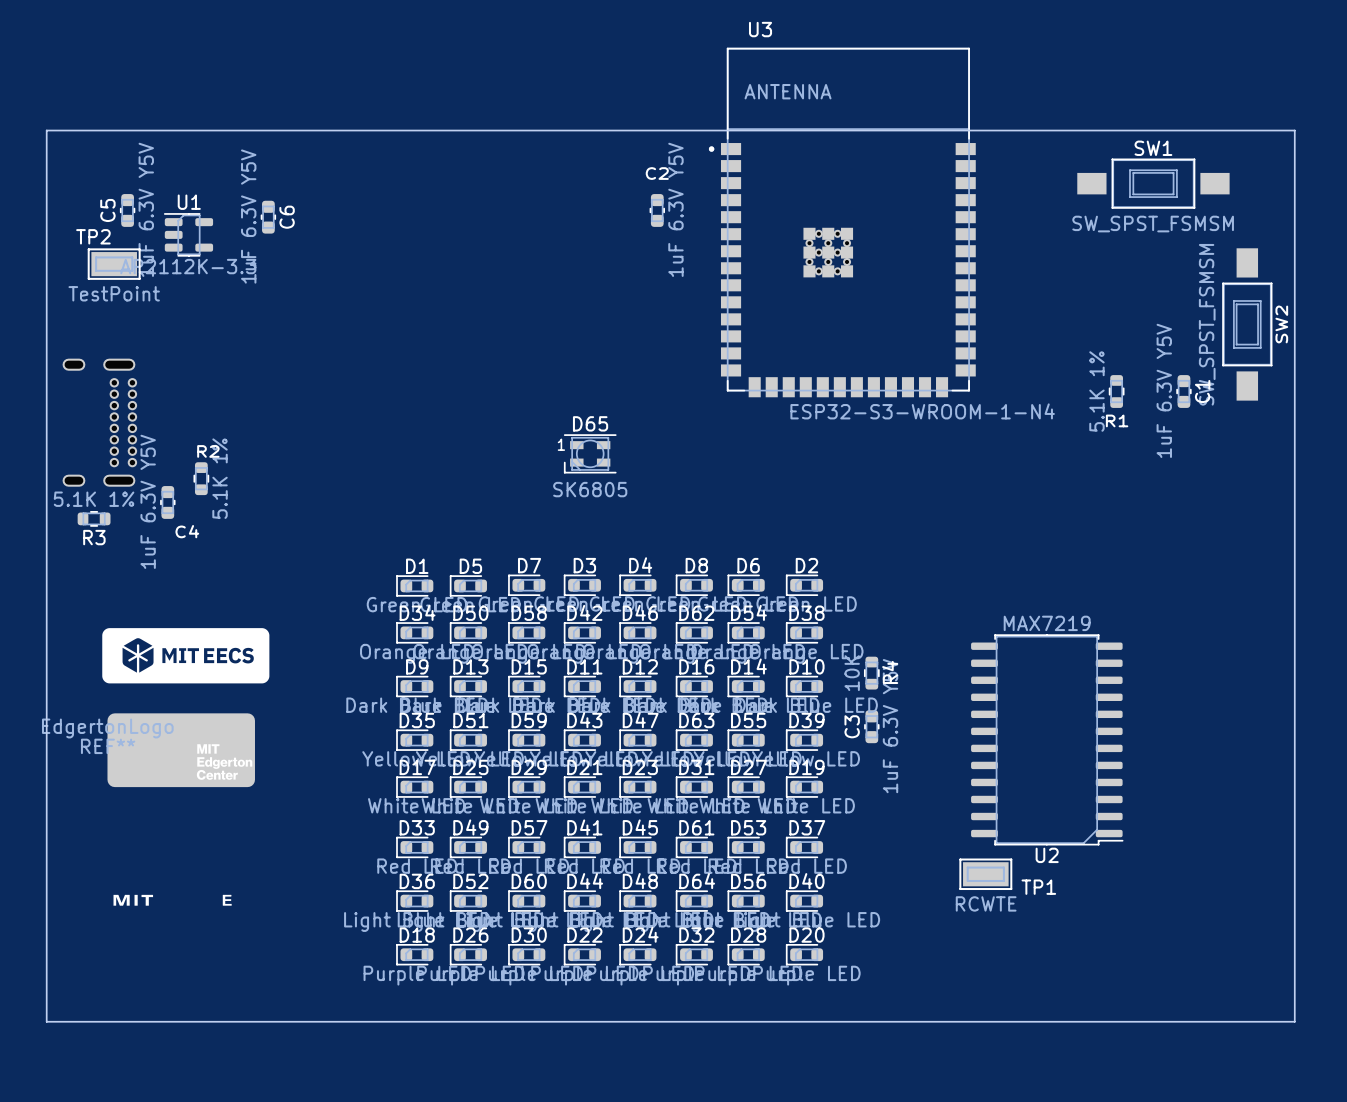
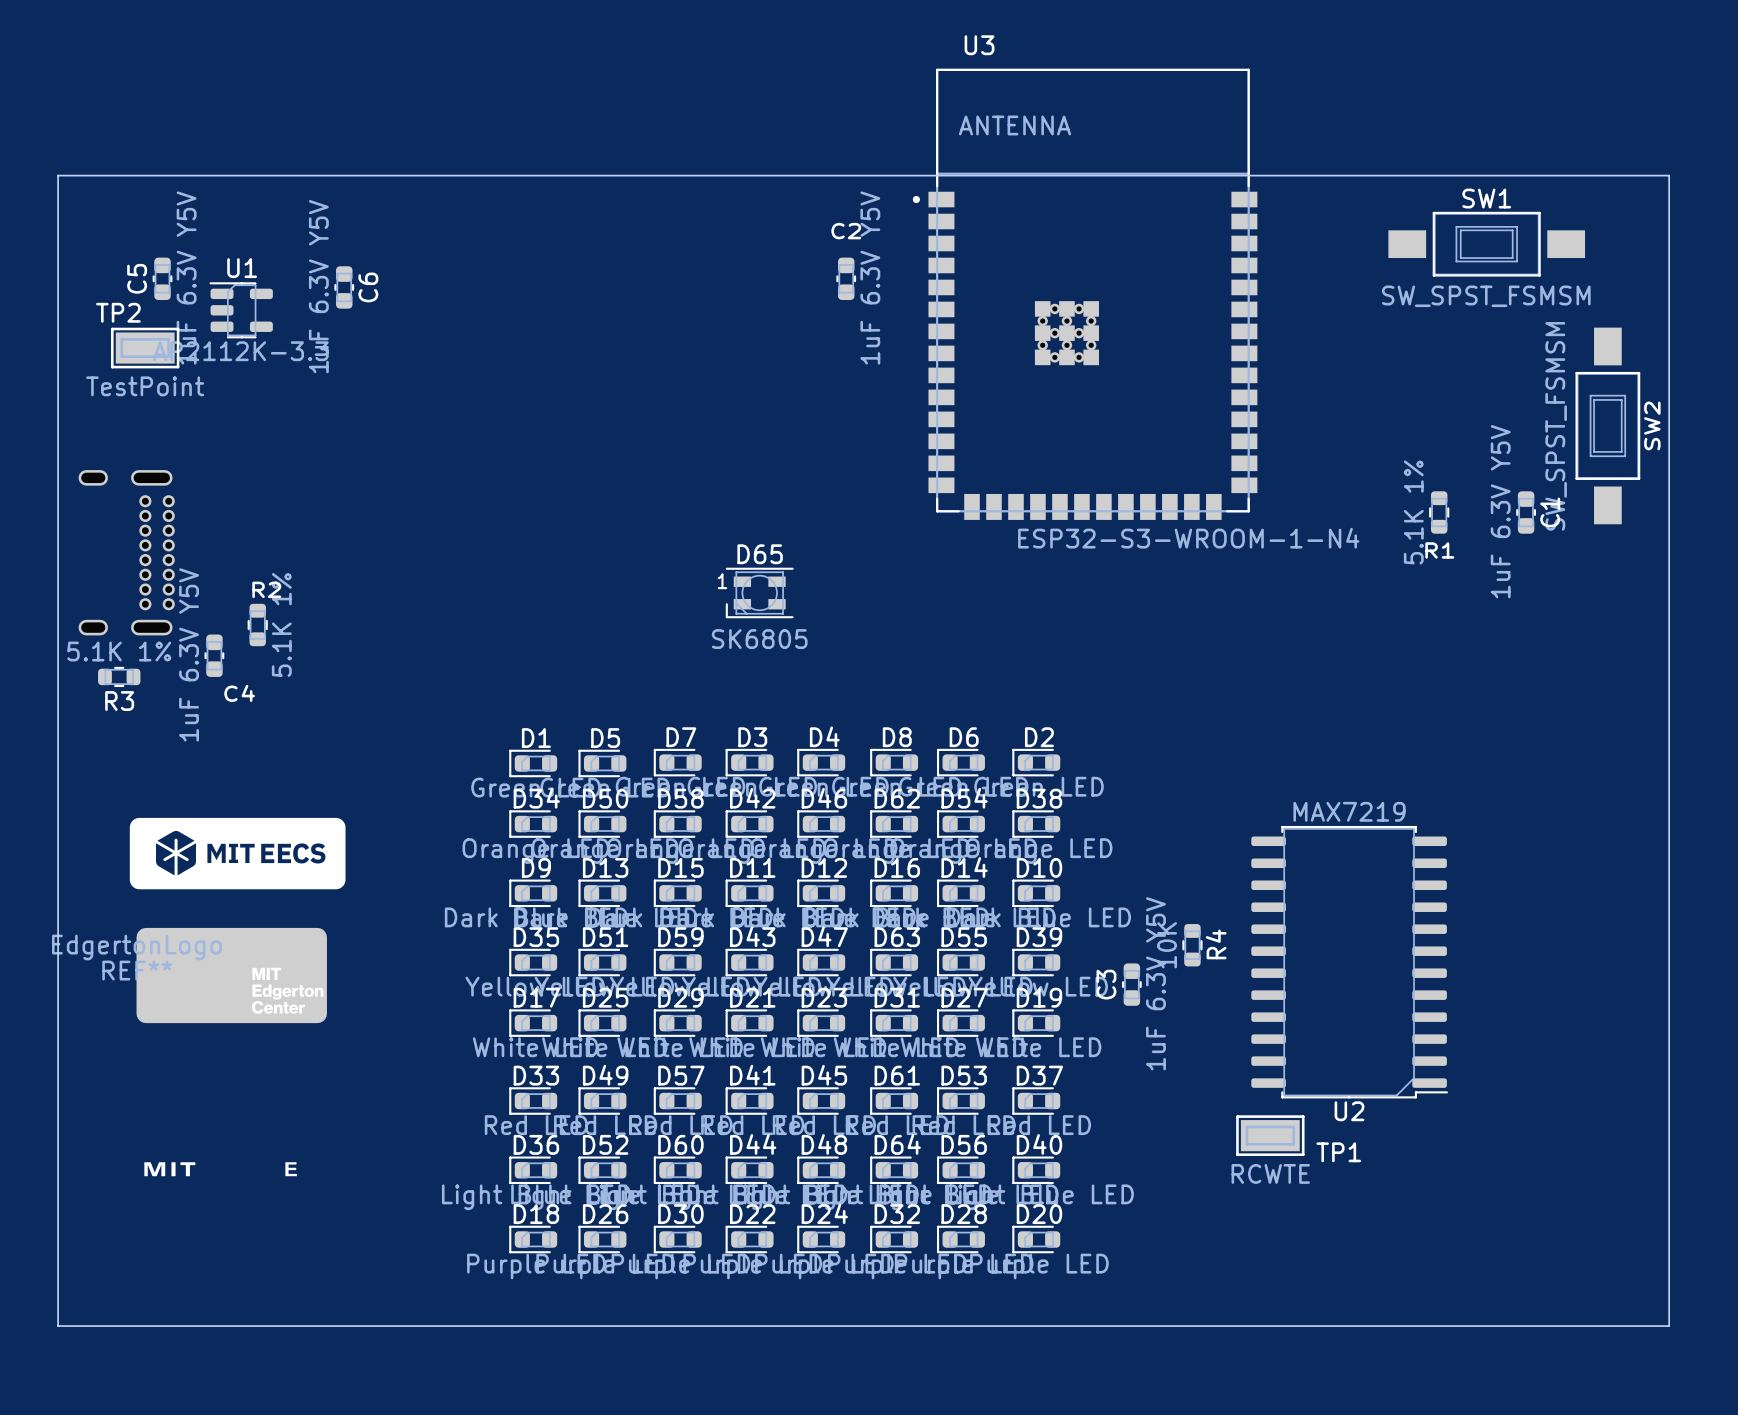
R4 position: (871, 673) -> (1192, 945)
C3 position: (871, 726) -> (1131, 984)

